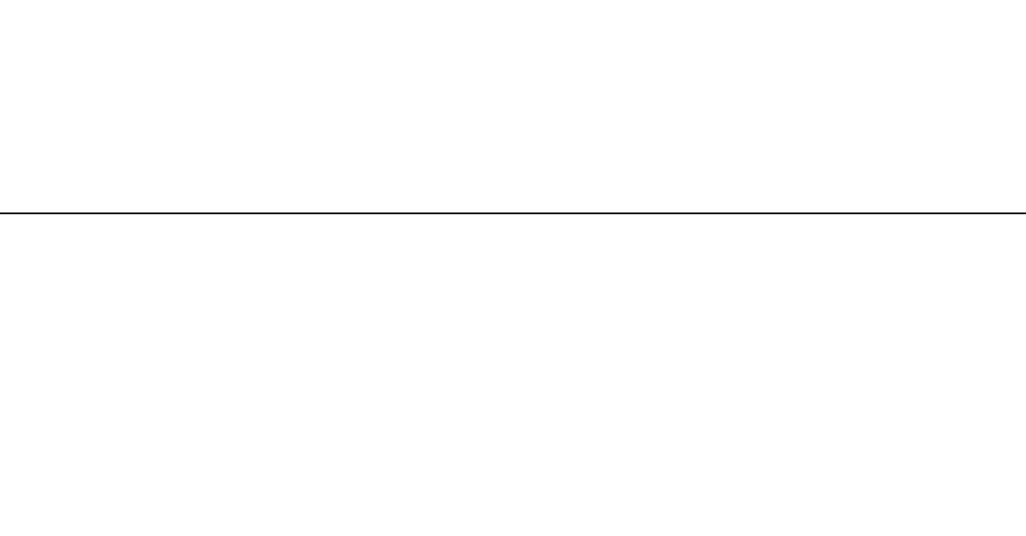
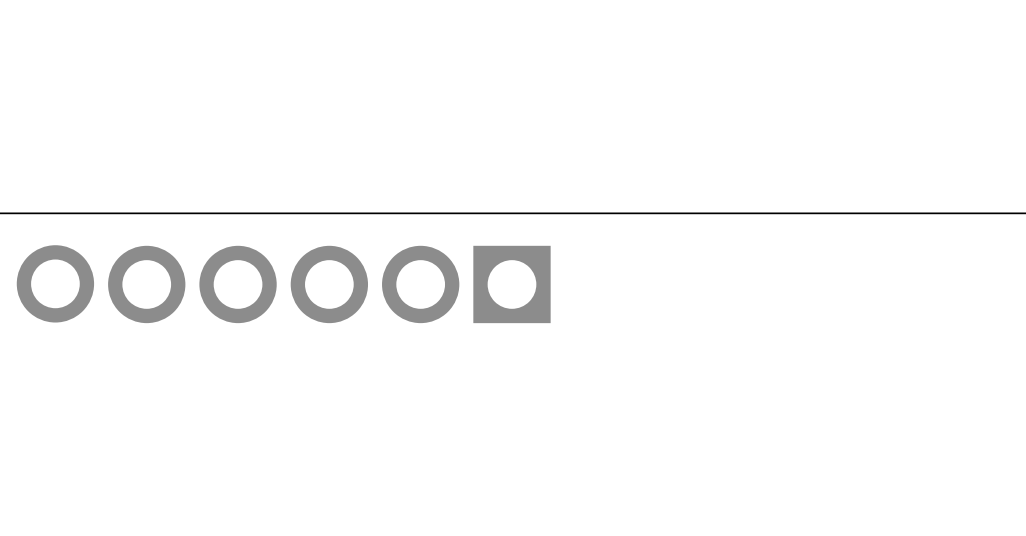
part: none -> (283, 284)

